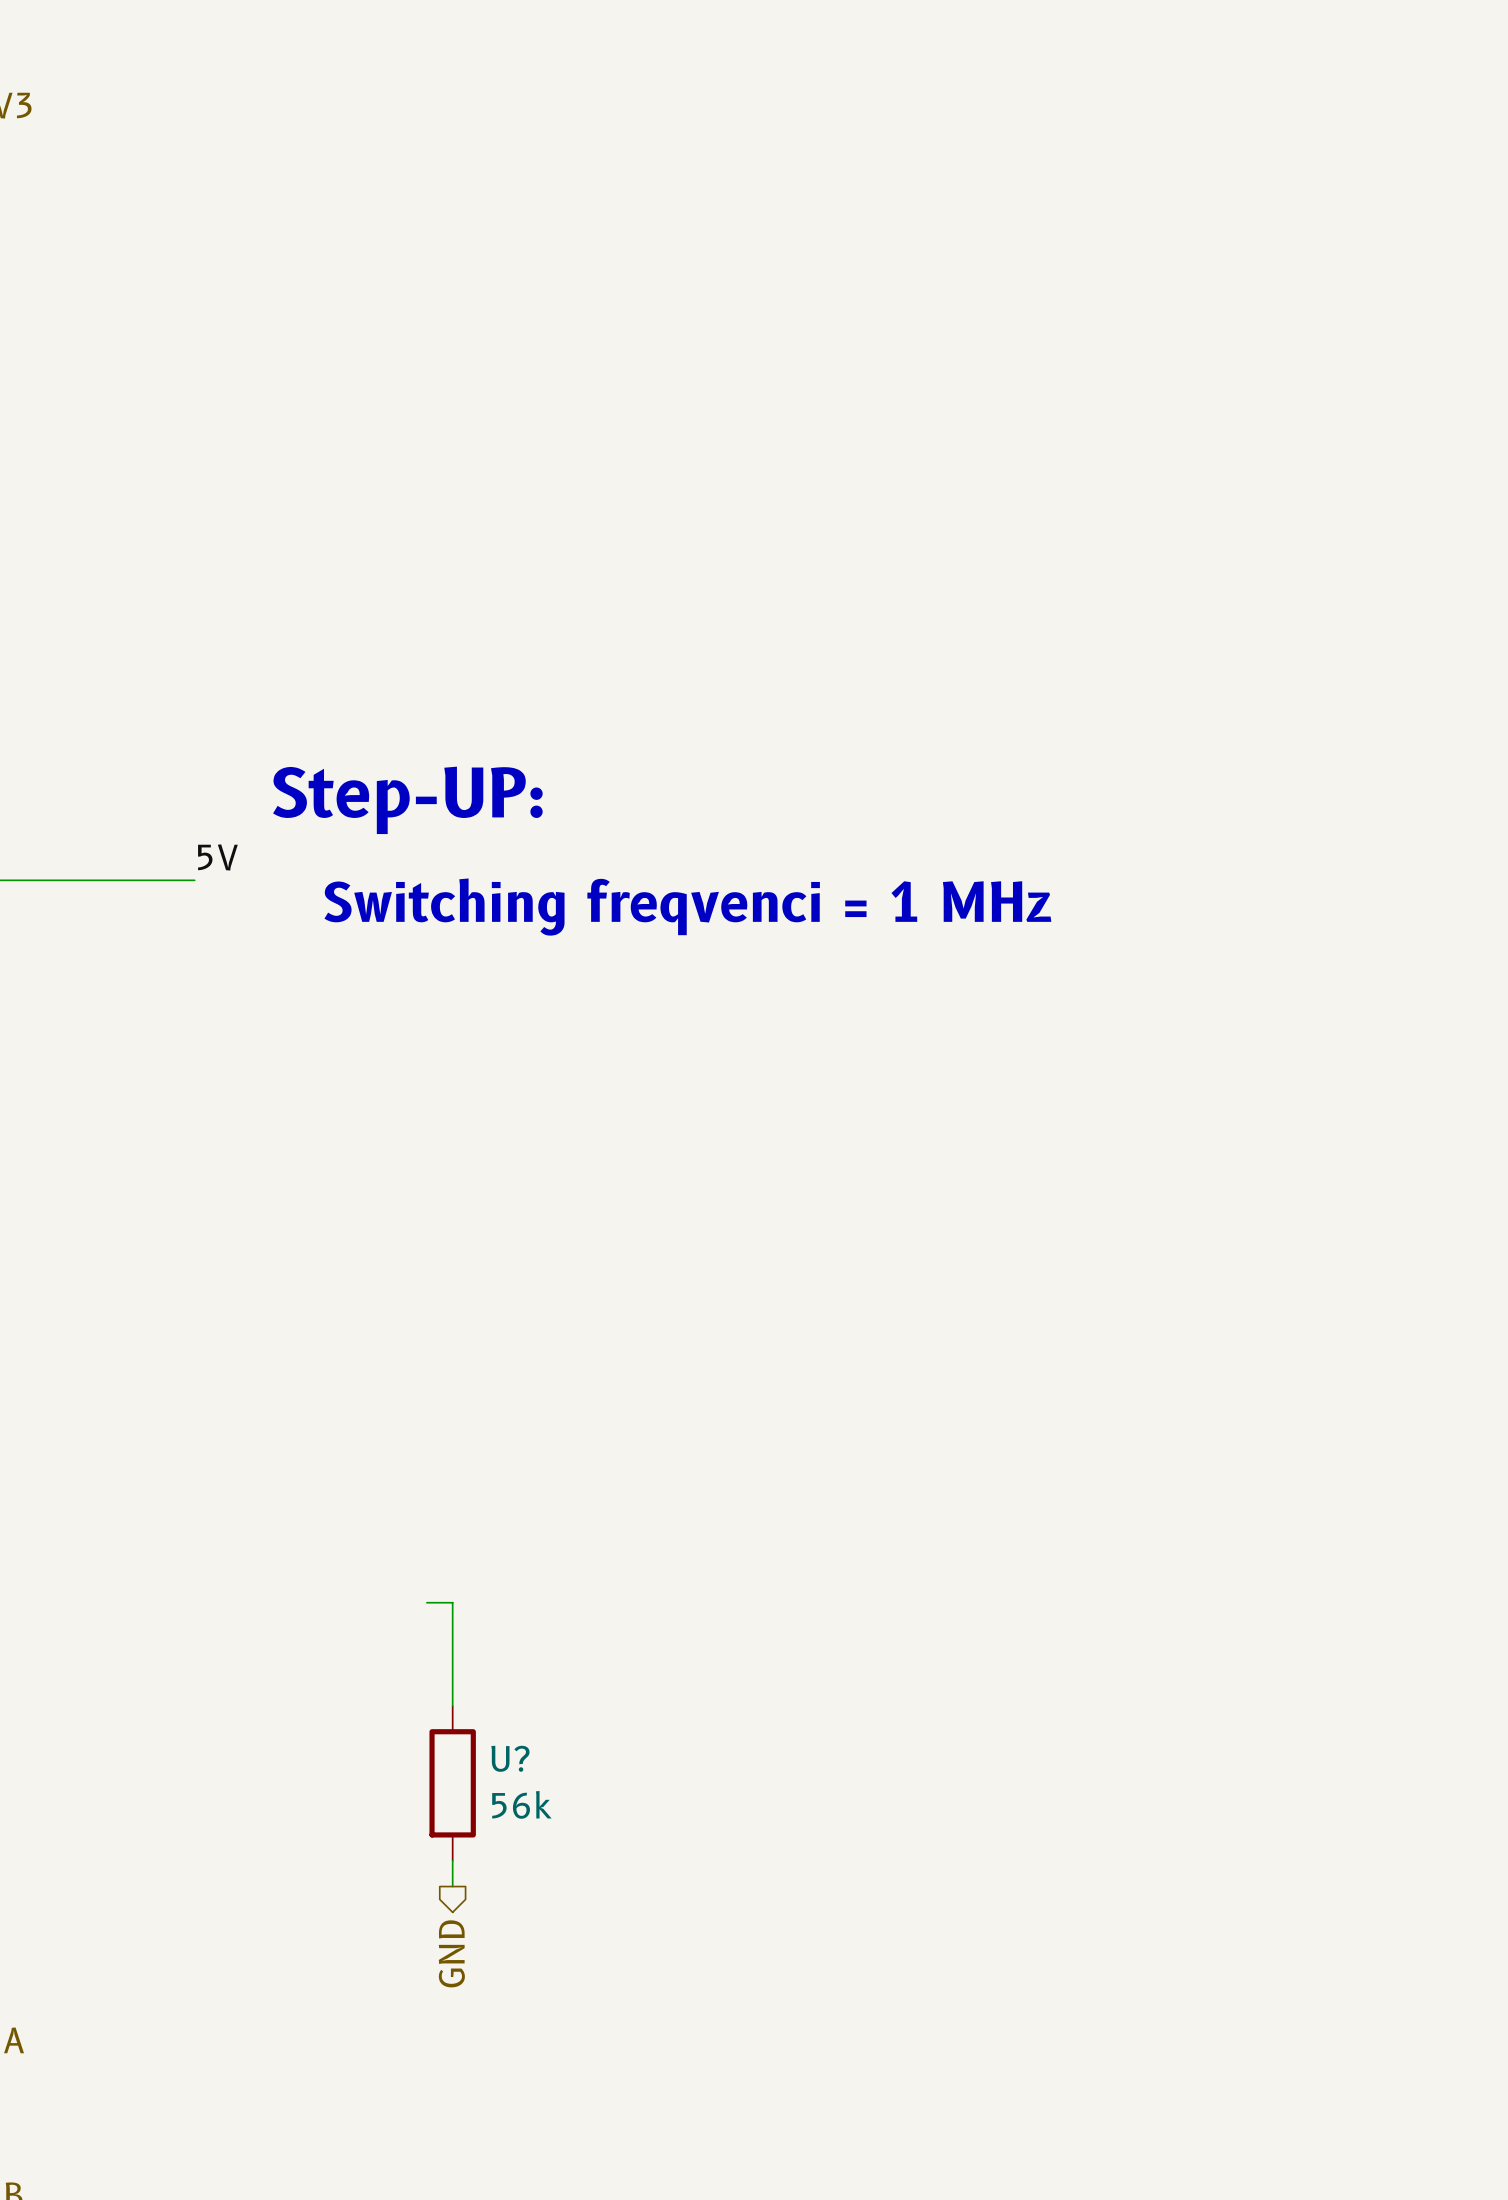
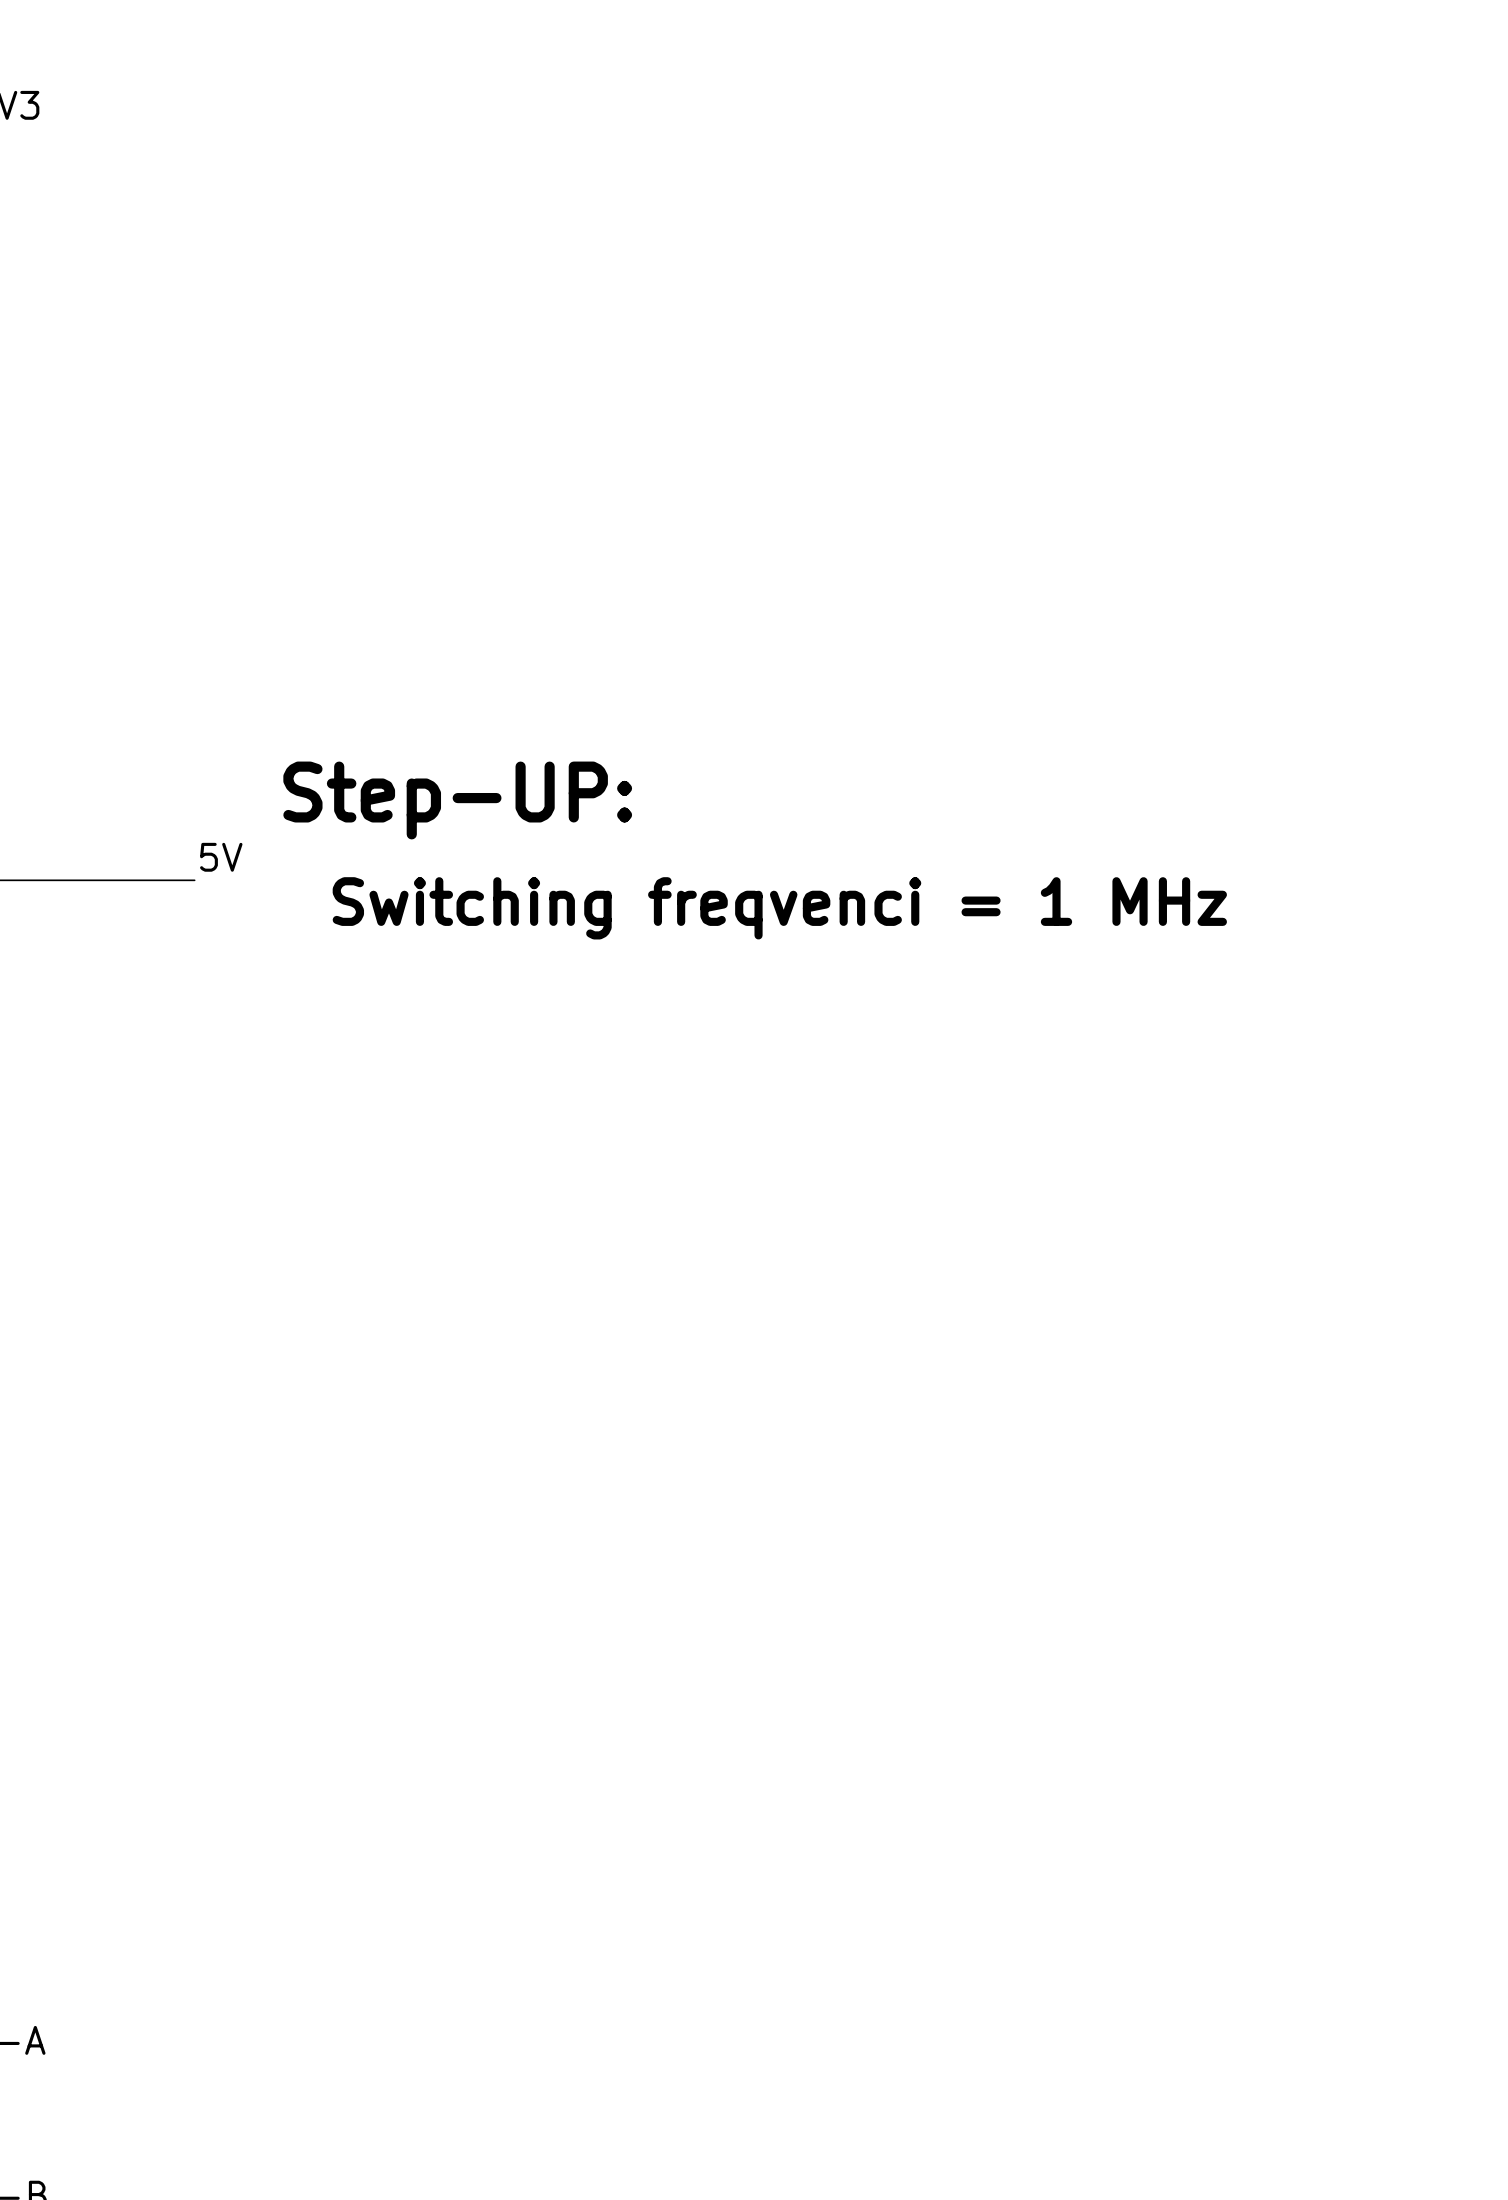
wire: (426, 1602) (452, 1602) (452, 1705) -> none
U?: 56k (452, 1783) -> none
wire: (452, 1860) (452, 1886) -> none
hierarchical label: GND (451, 1953) -> none

